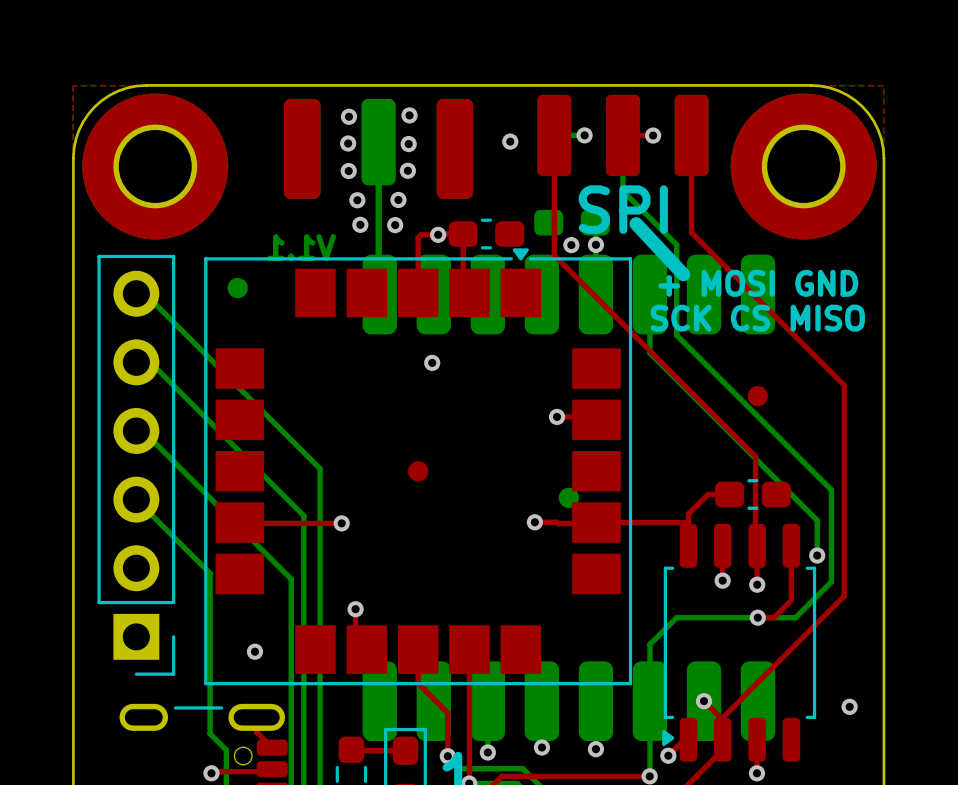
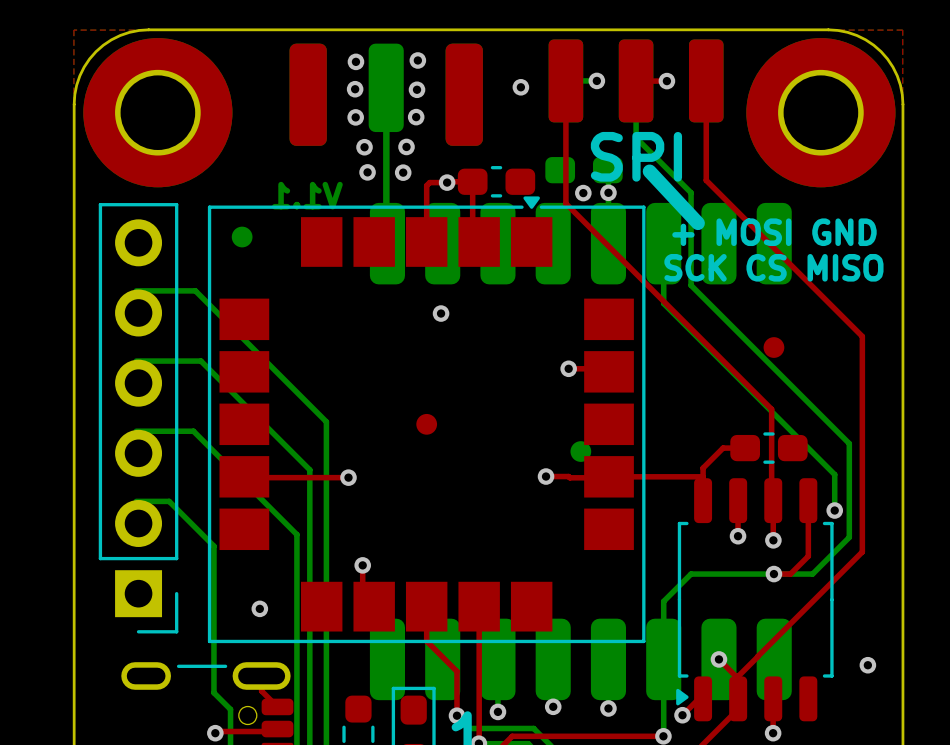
bottom track: (136, 293) (145, 293) (192, 340) -> (136, 290) (195, 290)
bottom track: (136, 362) (150, 362) (197, 409) -> (136, 361) (200, 361)
bottom track: (136, 430) (143, 430) (190, 477) -> (136, 431) (193, 431)
bottom track: (136, 499) (210, 573) (210, 590) -> (136, 501) (169, 501) (213, 546)
top track: (351, 749) (405, 750) -> none

